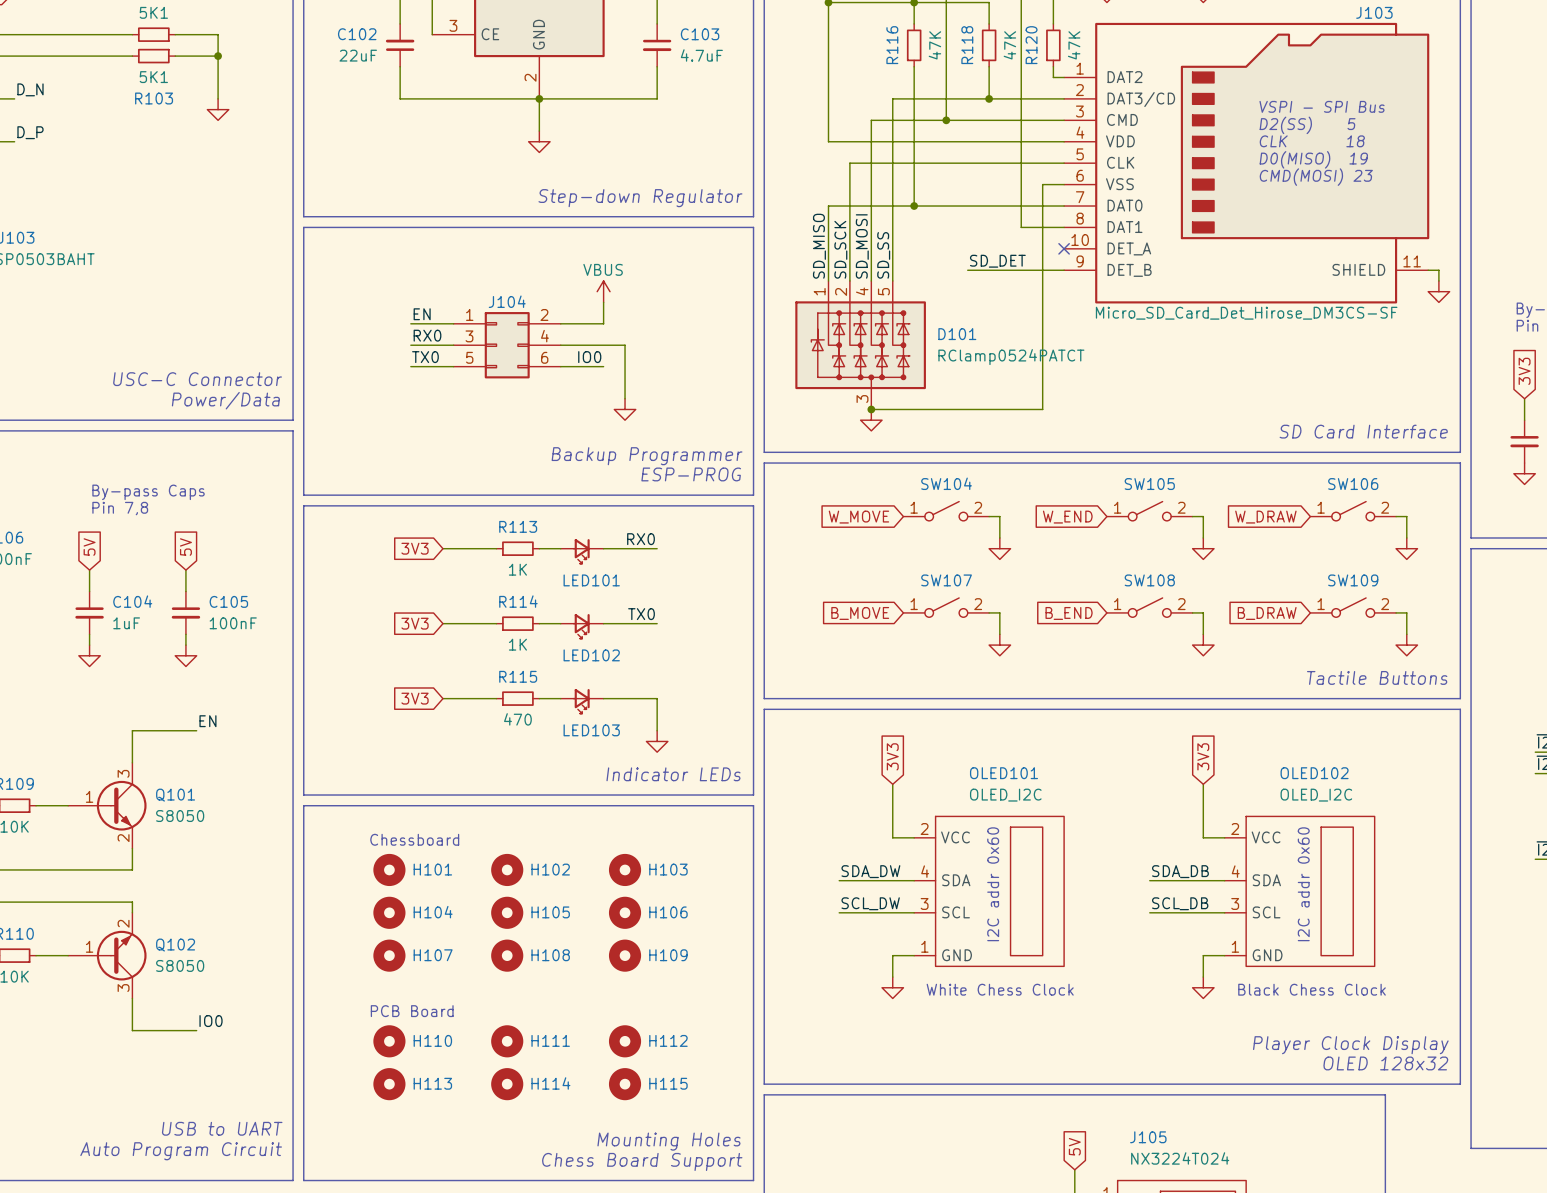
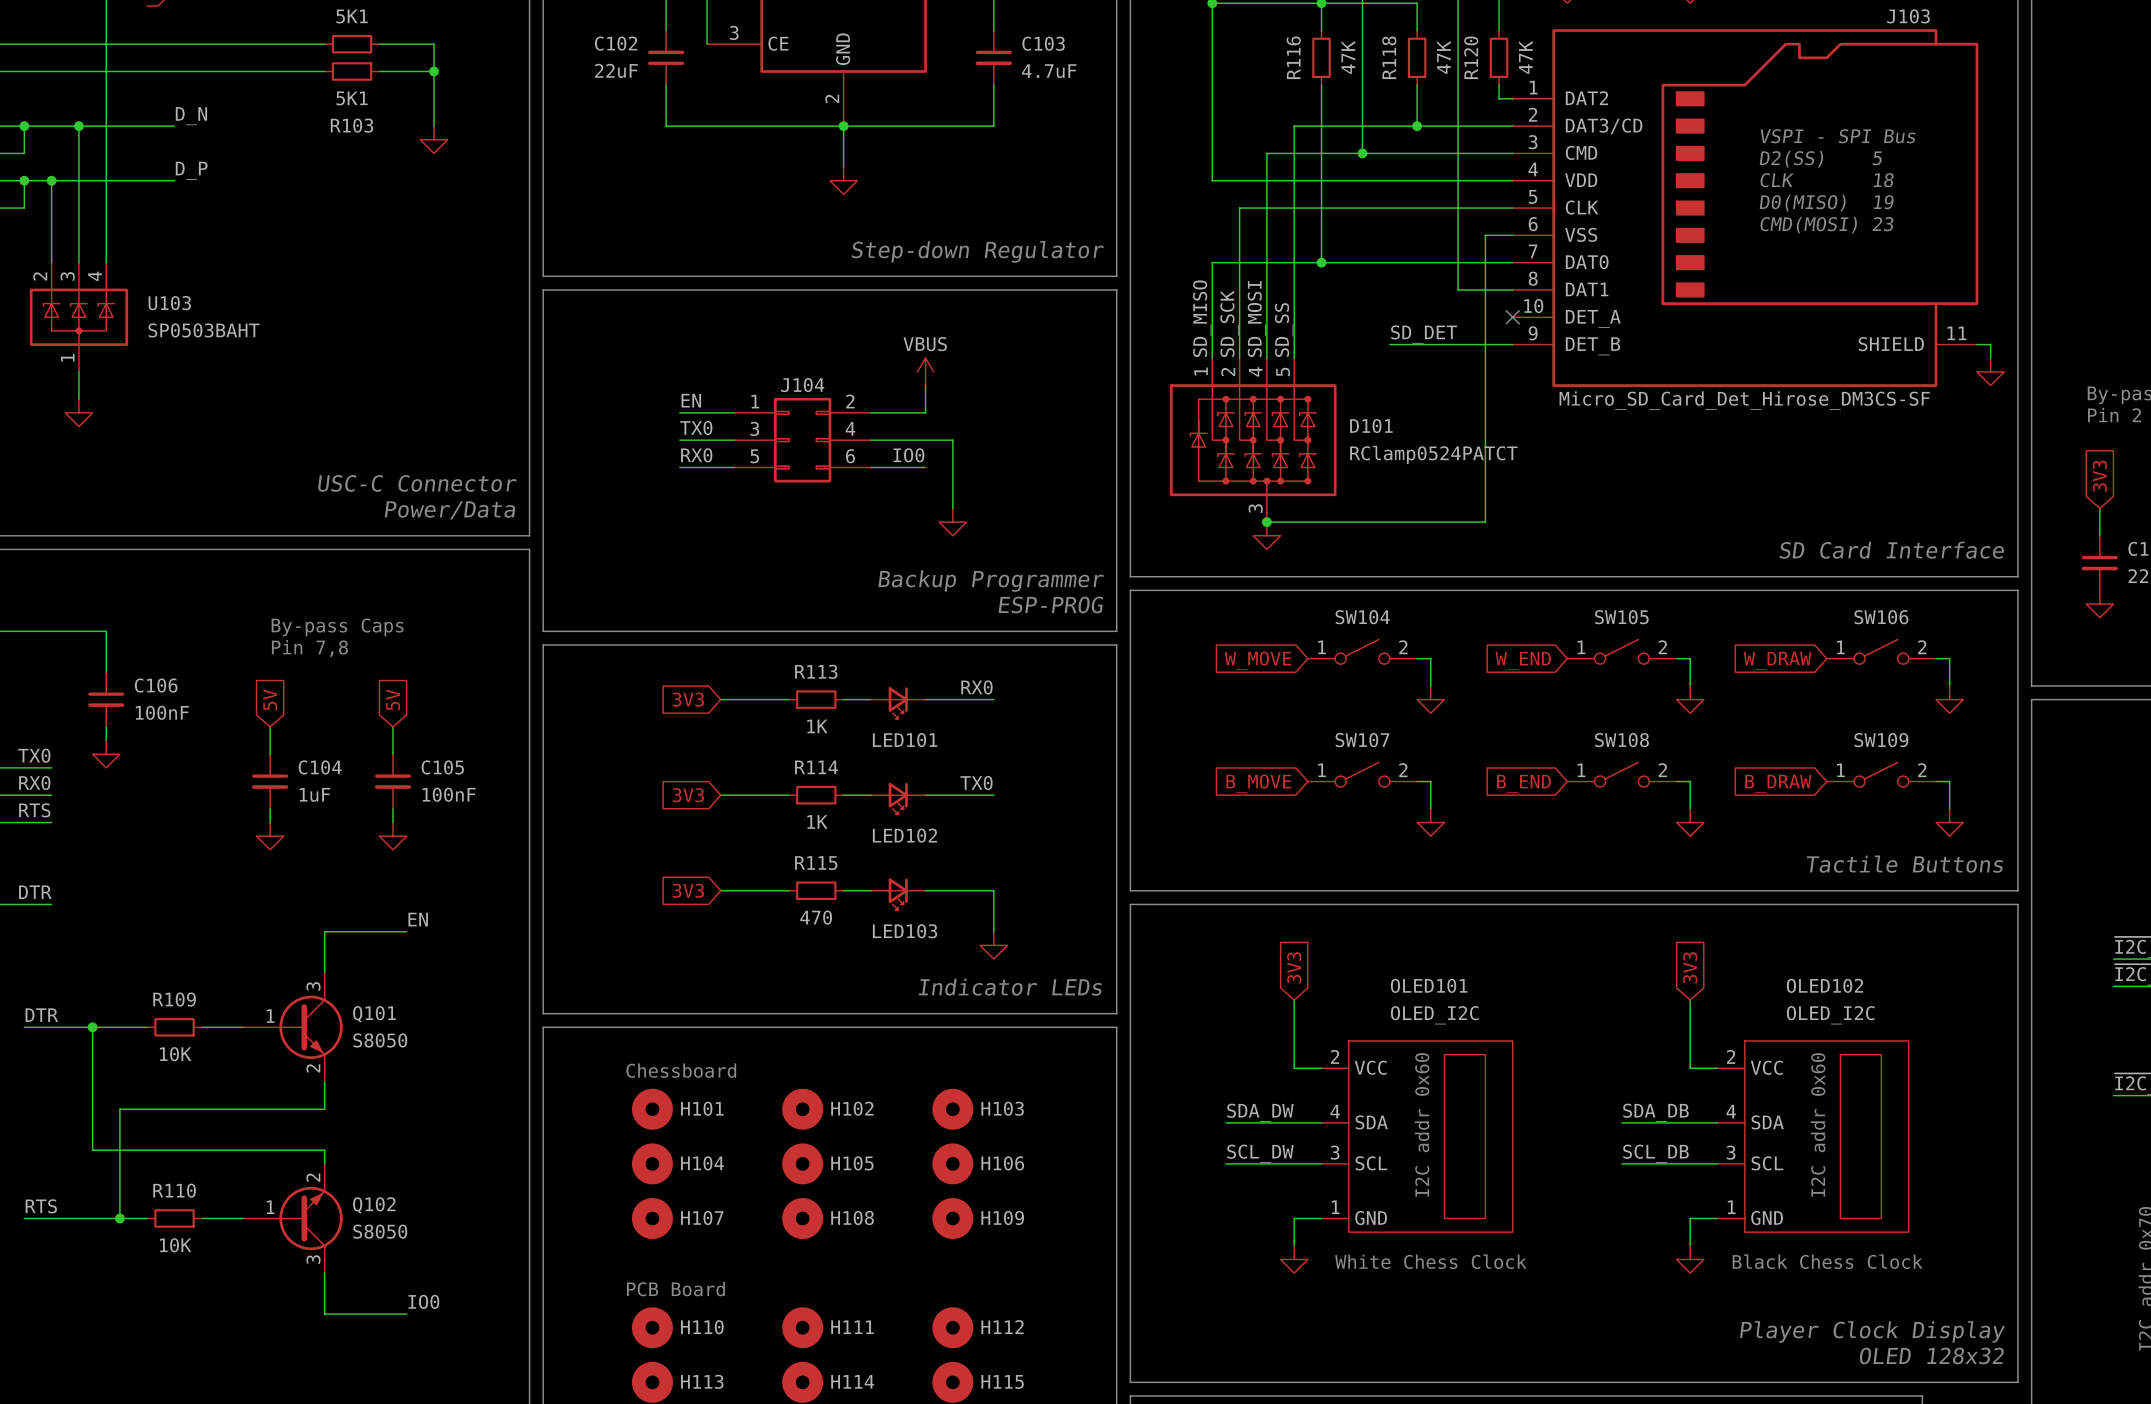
label: RX0 (427, 335) -> TX0 (696, 428)
label: TX0 (425, 357) -> RX0 (696, 455)

